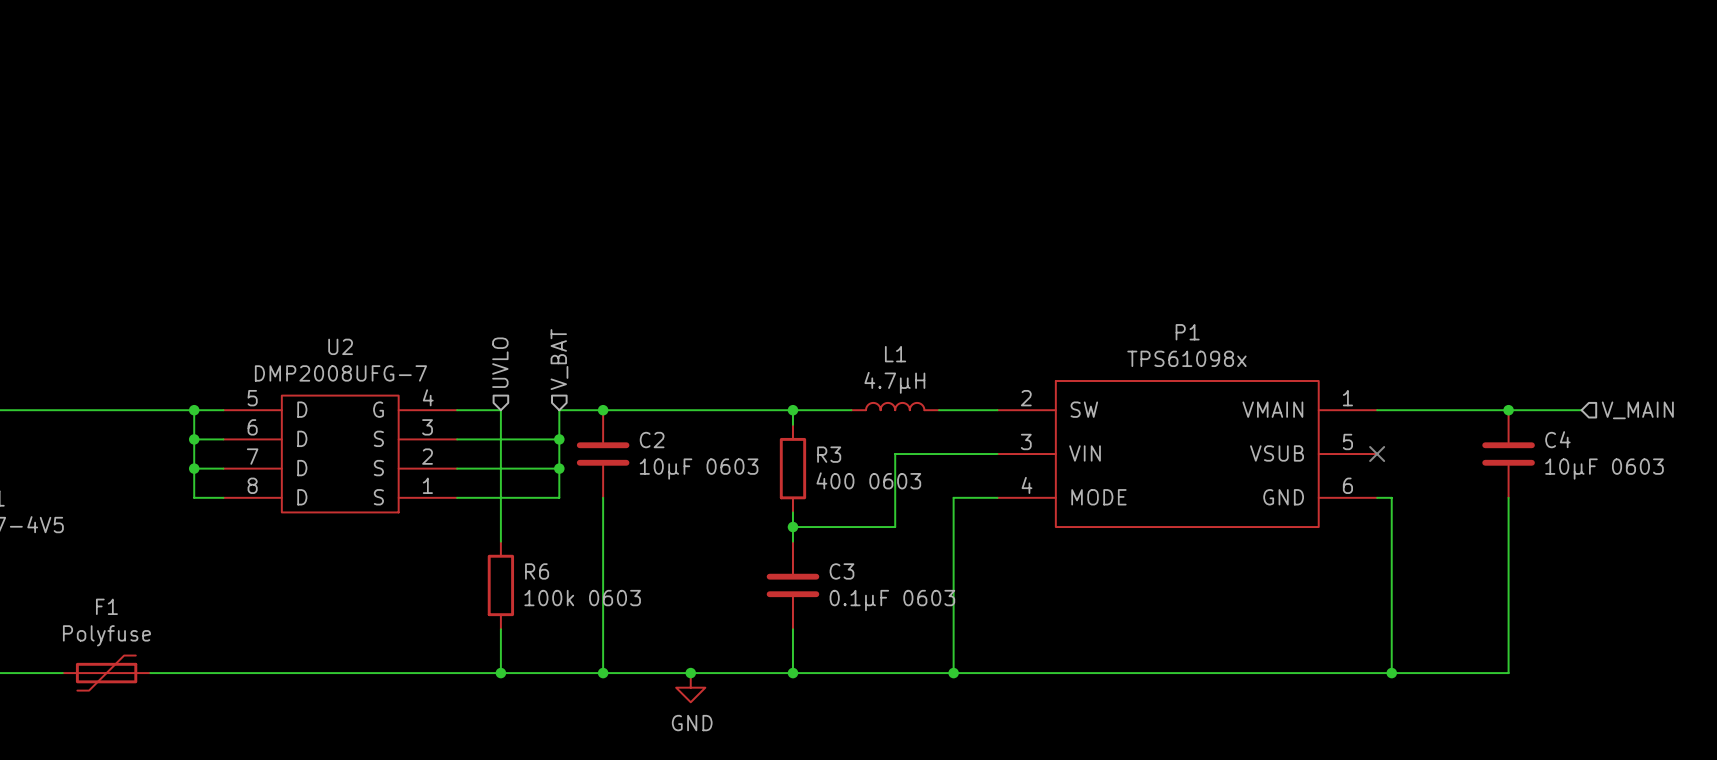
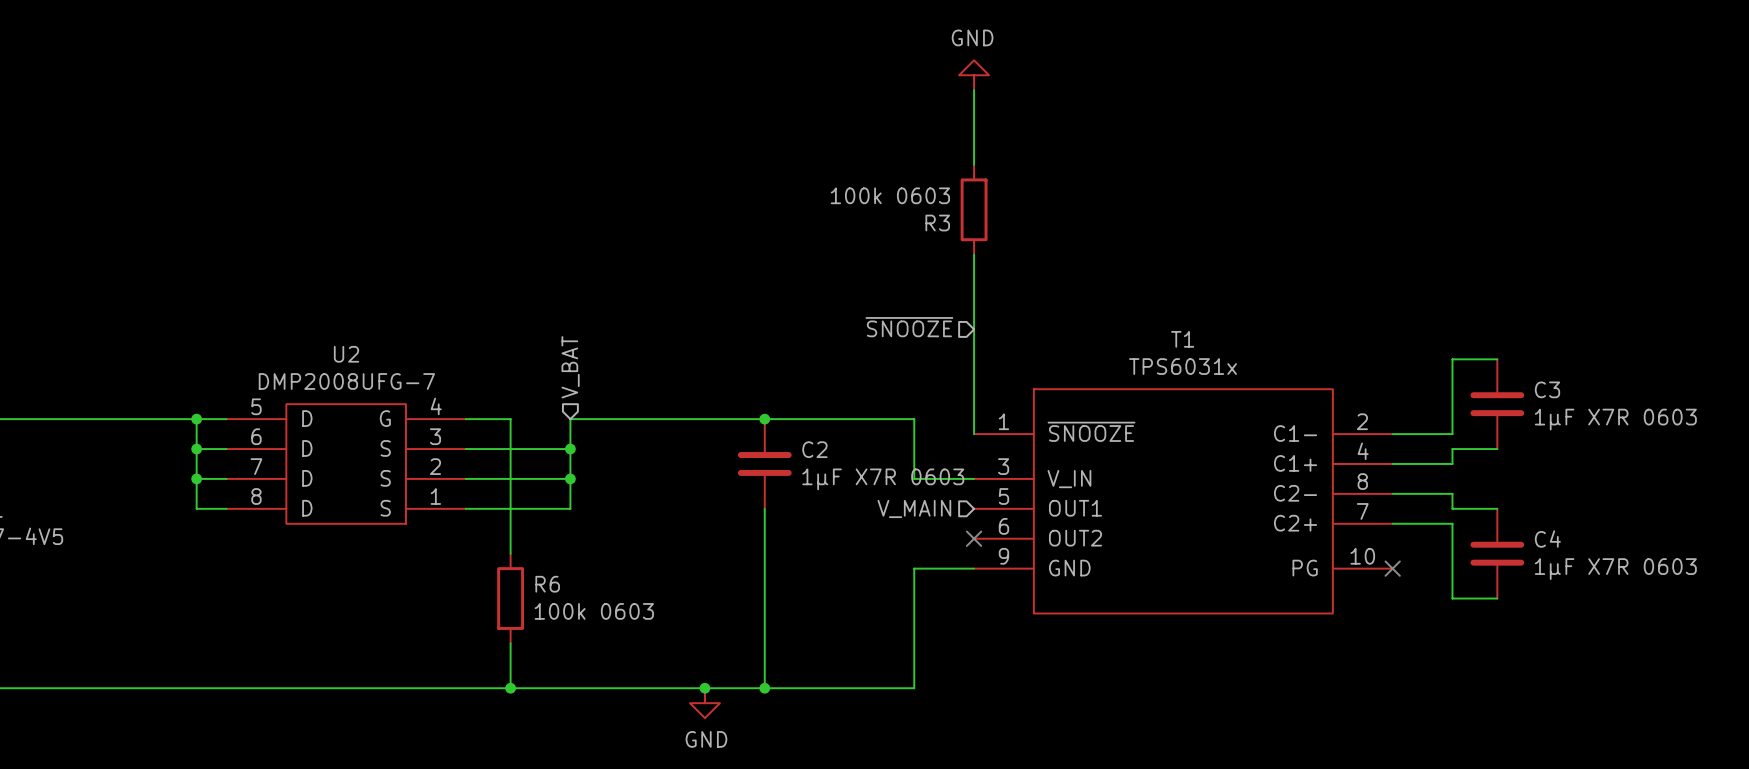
power symbol: none -> GND (974, 75)
wire: none -> (974, 90) (974, 164)
wire: none -> (974, 254) (974, 434)
hierarchical label: none -> ~{SNOOZE} (909, 327)
wire: none -> (1497, 359) (1452, 359) (1452, 434) (1392, 434)
hierarchical label: UVLO (500, 362) -> none
L1: 4.7µH (895, 406) -> none
junction: (603, 410) -> none
wire: (792, 410) (792, 424) -> none
junction position: (792, 410) -> (764, 419)
wire: (939, 410) (997, 410) -> none
wire: (1377, 410) (1581, 410) -> none
junction: (1508, 410) -> none
hierarchical label: V_MAIN (1637, 410) -> none
wire: none -> (1497, 449) (1452, 449) (1452, 463) (1392, 463)
C2 position: (603, 454) -> (764, 463)
R3 name position: R3 (829, 454) -> R3 (937, 223)
wire: (895, 454) (997, 454) -> (914, 463) (914, 419) (869, 419)
P1: TPS61098x (1187, 454) -> none
no-connect mark: (1377, 454) -> none
C4 position: (1508, 454) -> (1497, 553)
R3 position: (792, 468) -> (974, 209)
wire: (895, 468) (895, 527) (792, 527) -> (914, 478) (974, 478)
C2 value: 10µF 0603 (699, 469) -> 1µF X7R 0603 (883, 479)
C4 value: 10µF 0603 (1604, 469) -> 1µF X7R 0603 (1615, 569)
R3 value: 400 0603 (868, 480) -> 100k 0603 (890, 195)
wire: none -> (1392, 493) (1452, 493) (1452, 508) (1497, 508)
T1: none -> TPS6031x (1183, 501)
wire: (603, 497) (603, 673) -> (764, 508) (764, 688)
hierarchical label: none -> V_MAIN (914, 508)
wire: (997, 497) (953, 497) (953, 673) -> none
wire: (1377, 497) (1391, 497) (1391, 673) -> none
wire: (1508, 497) (1508, 673) (895, 673) -> (974, 568) (914, 568) (914, 688)
wire: (792, 512) (792, 541) -> none
wire: none -> (1392, 523) (1452, 523) (1452, 598) (1497, 598)
junction: (792, 527) -> none
no-connect mark: none -> (974, 538)
no-connect mark: none -> (1392, 568)
C3 position: (792, 585) -> (1497, 404)
C3 value: 0.1µF 0603 (892, 600) -> 1µF X7R 0603 (1615, 419)
wire: (792, 629) (792, 673) -> none
F1: Polyfuse (106, 673) -> none
junction: (603, 673) -> none
junction position: (792, 673) -> (764, 688)
junction: (953, 673) -> none
junction: (1391, 673) -> none

